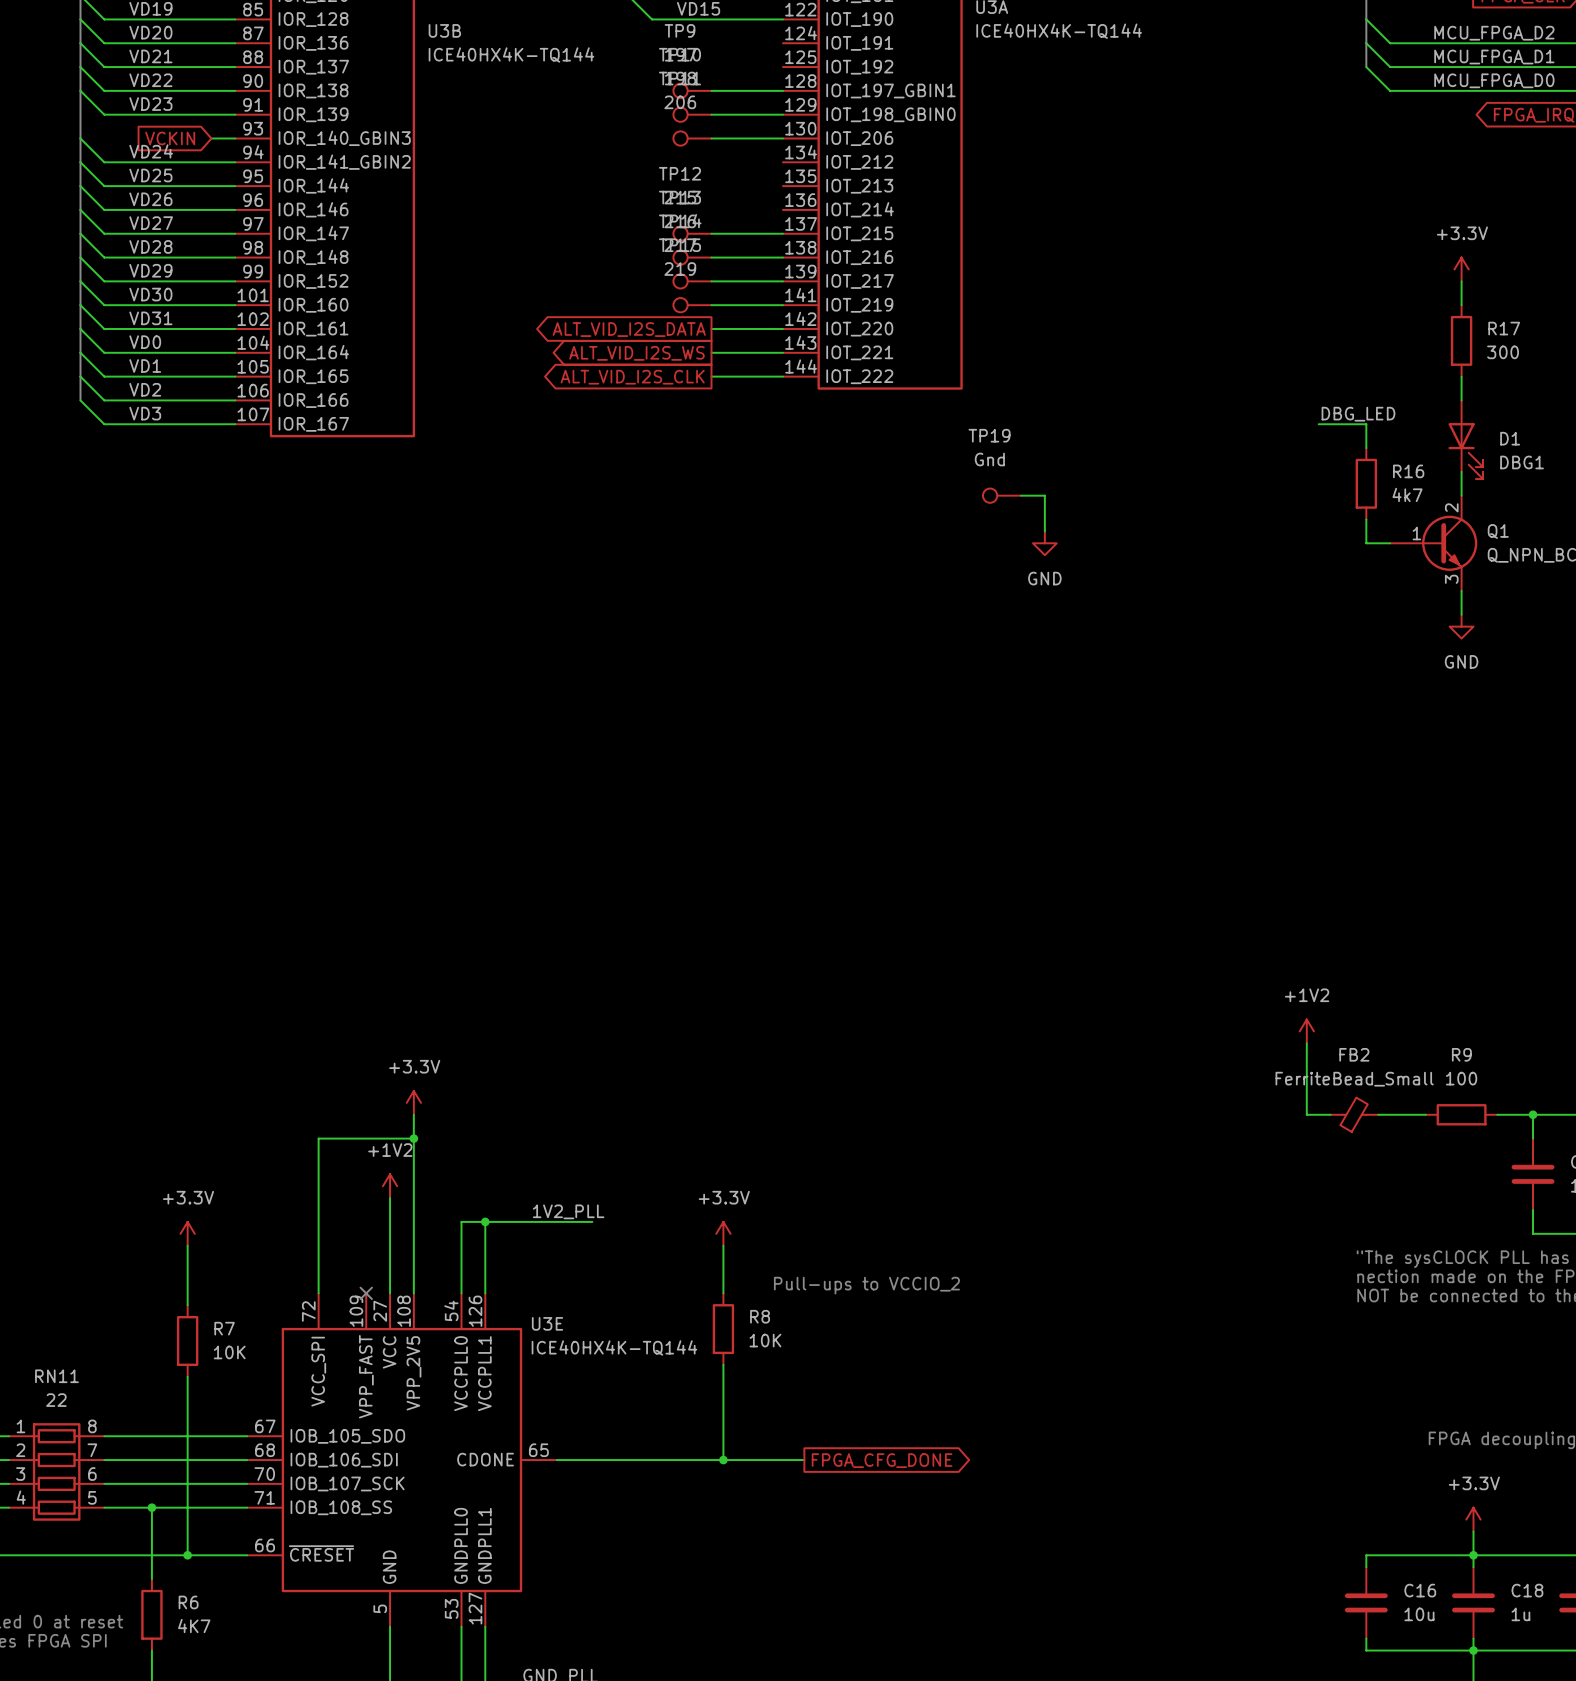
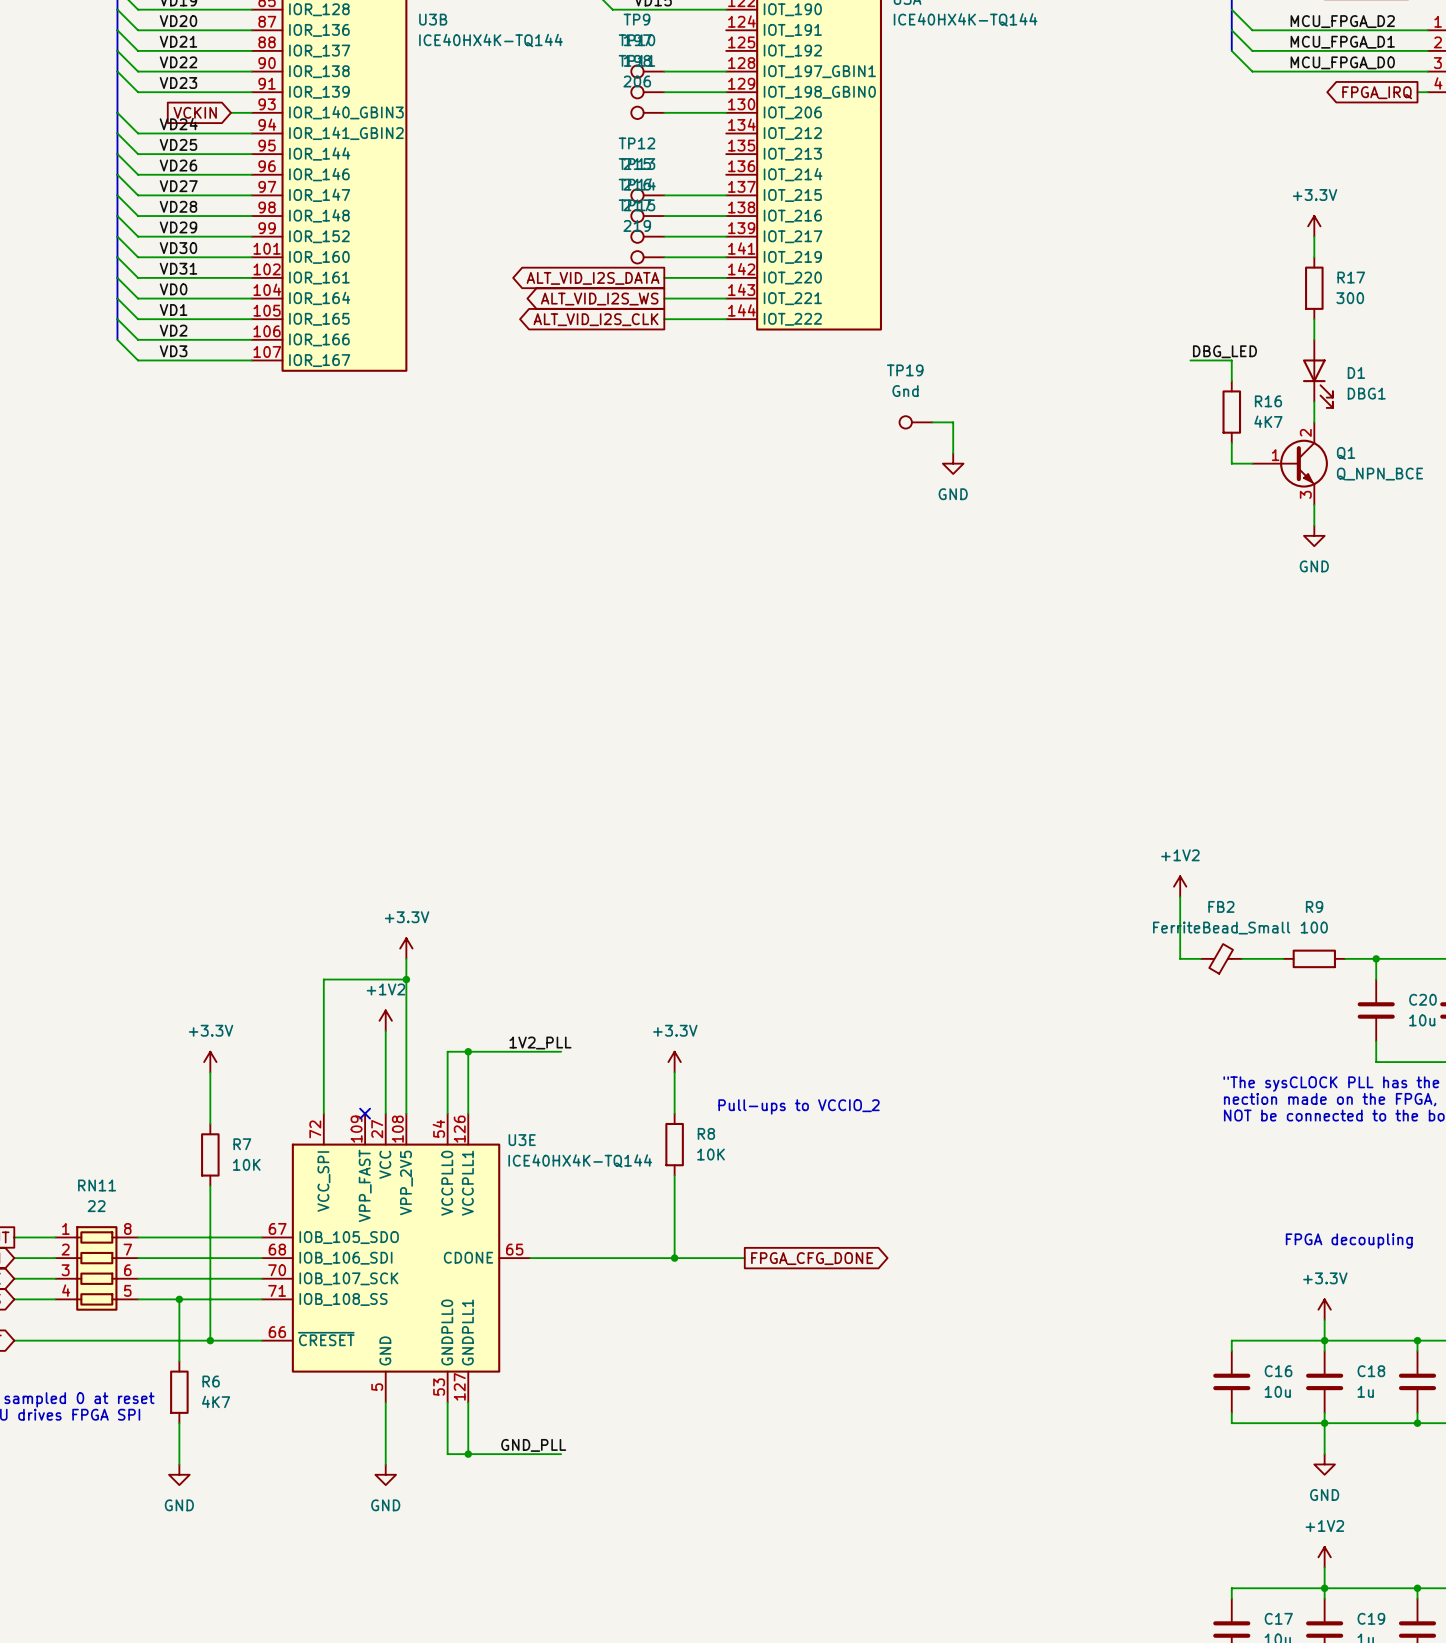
R16 value: 4k7 (1407, 494) -> 4K7 (1268, 421)

